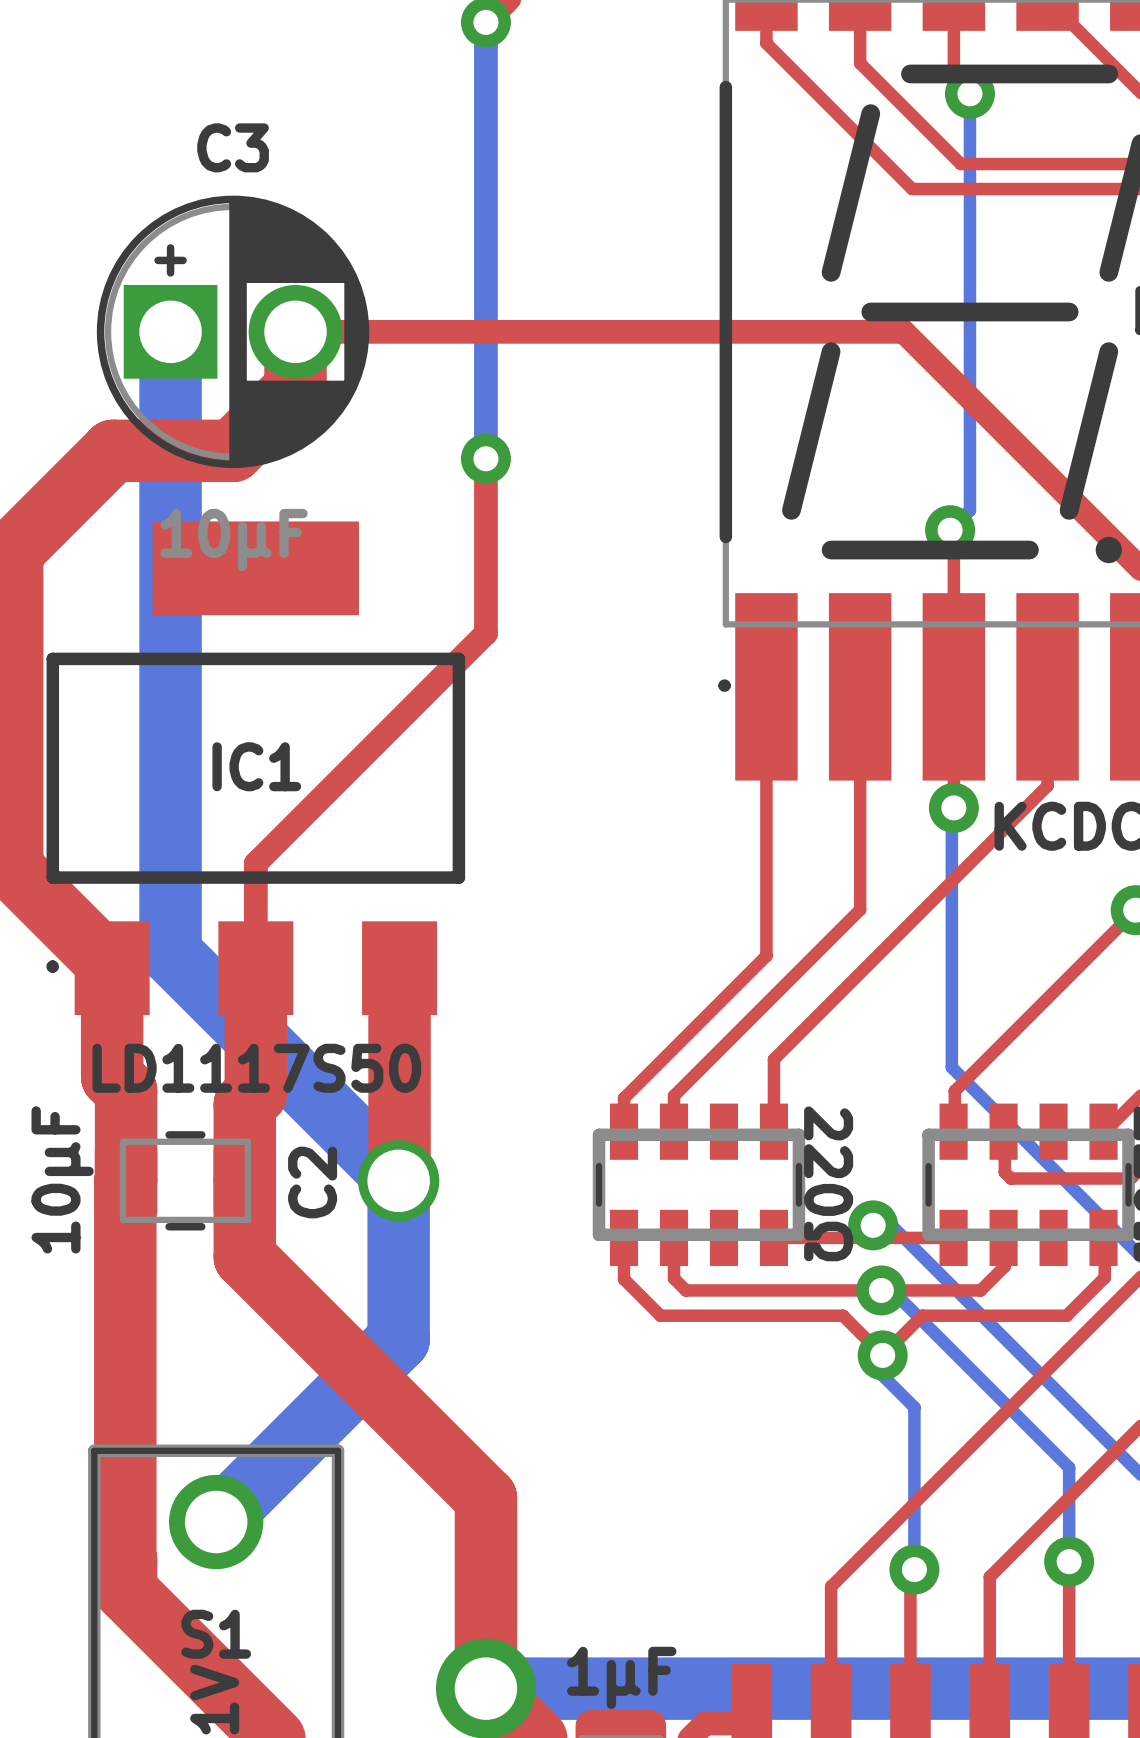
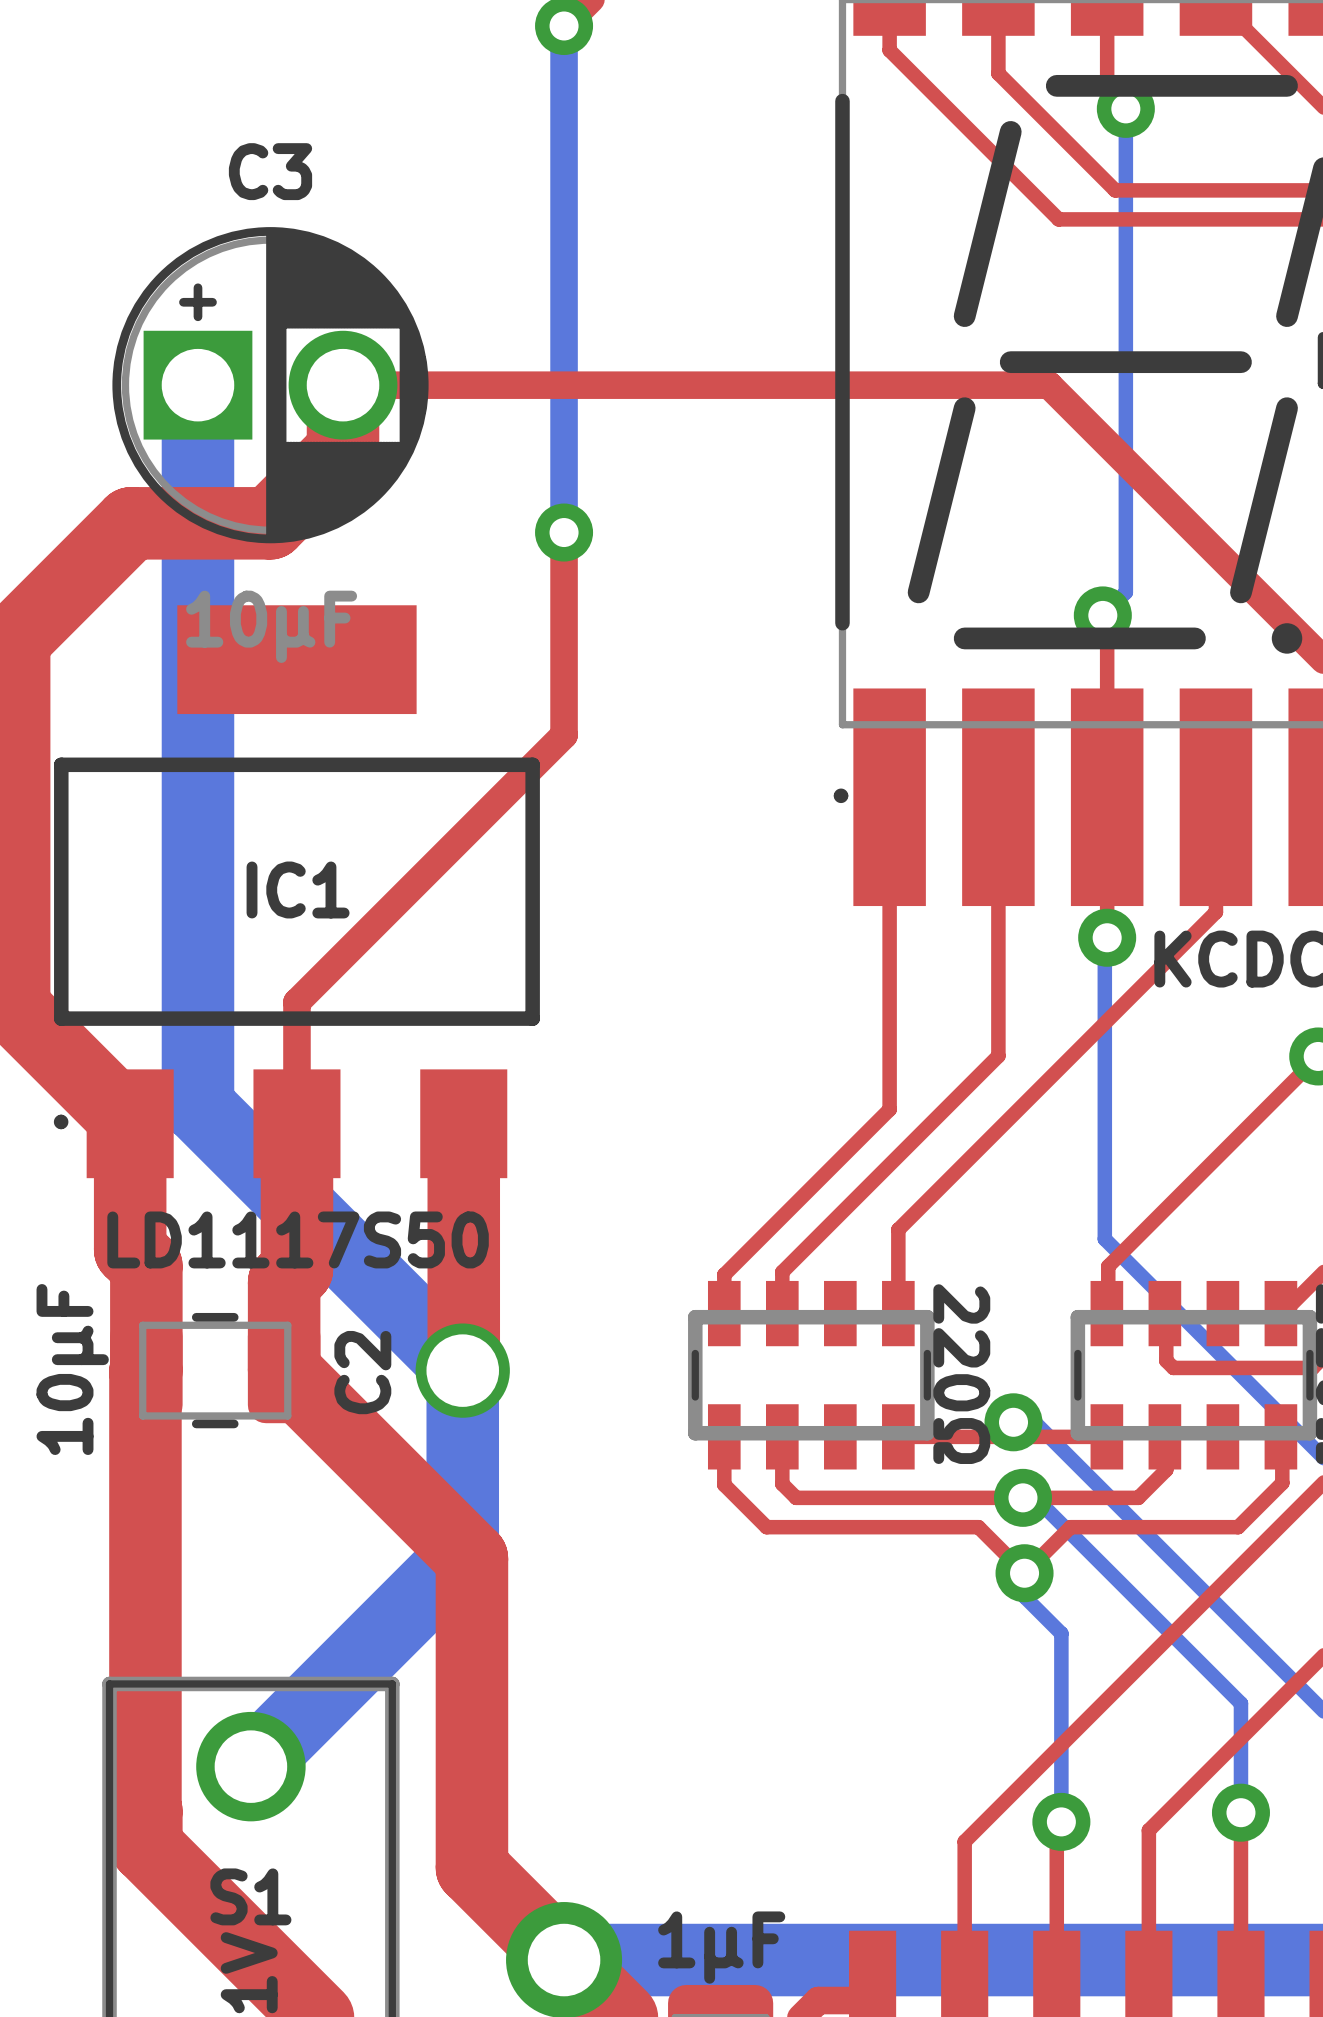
top track: (244, 1180) (244, 1257) (485, 1498) (485, 1688) -> (284, 1370) (471, 1558) (471, 1867) (564, 1960)

